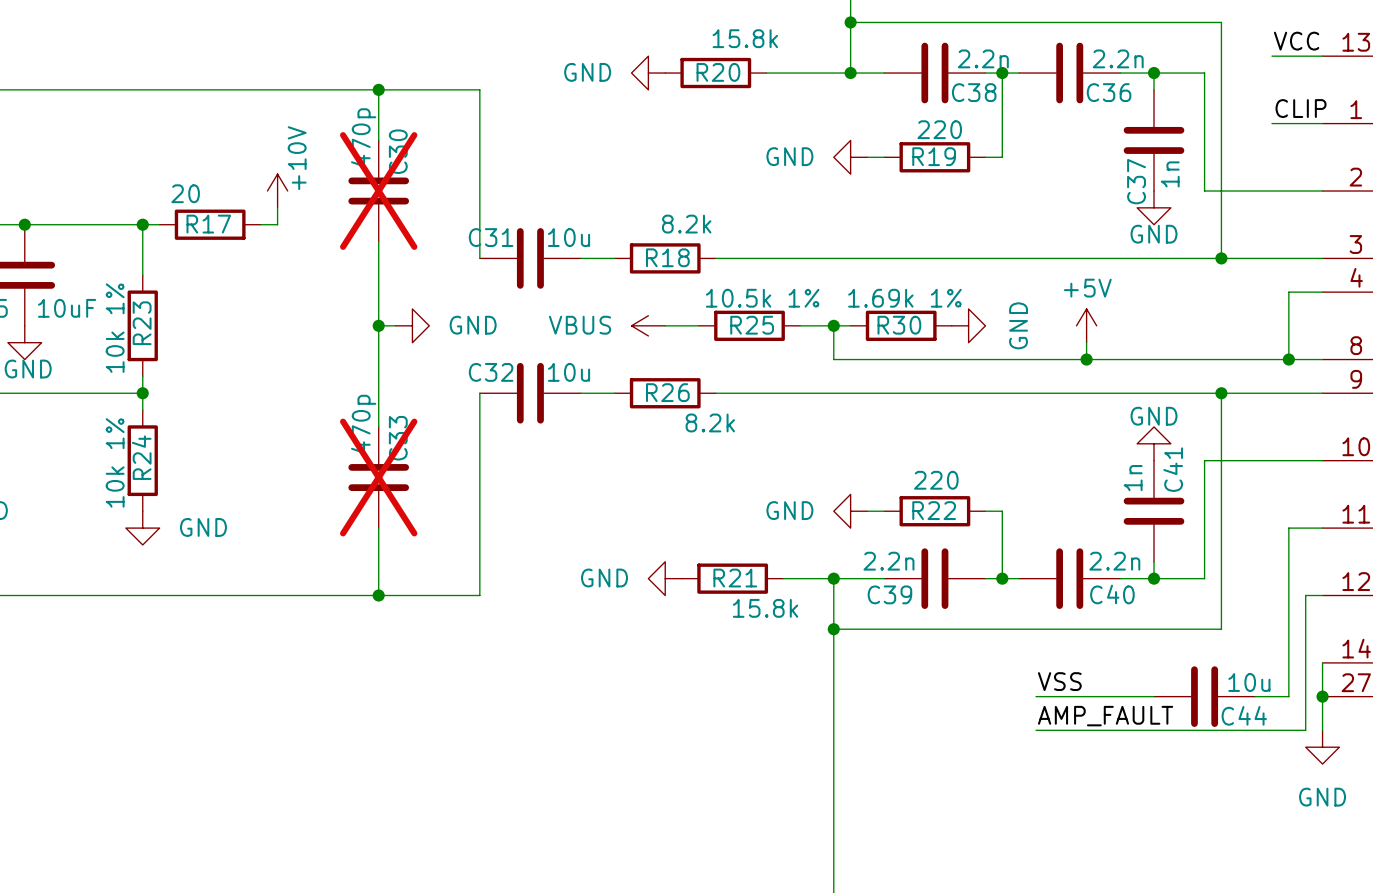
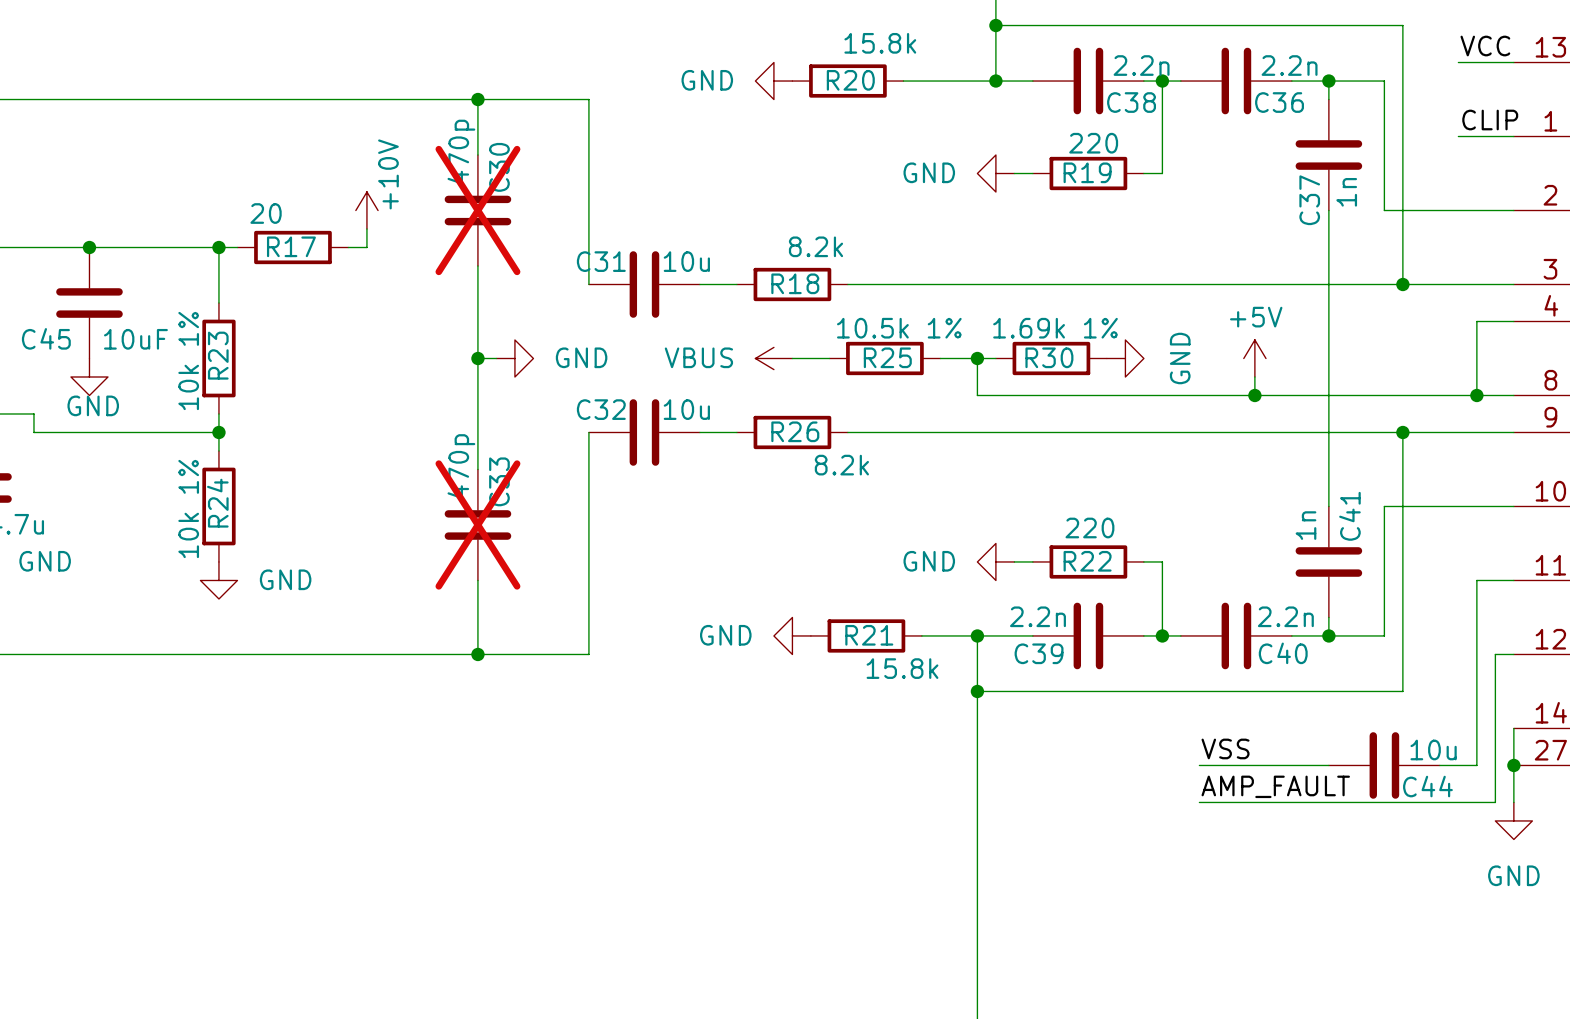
wire: none -> (1328, 210) (1328, 506)
power symbol: GND (1154, 207) -> none
power symbol: GND (1154, 443) -> none

